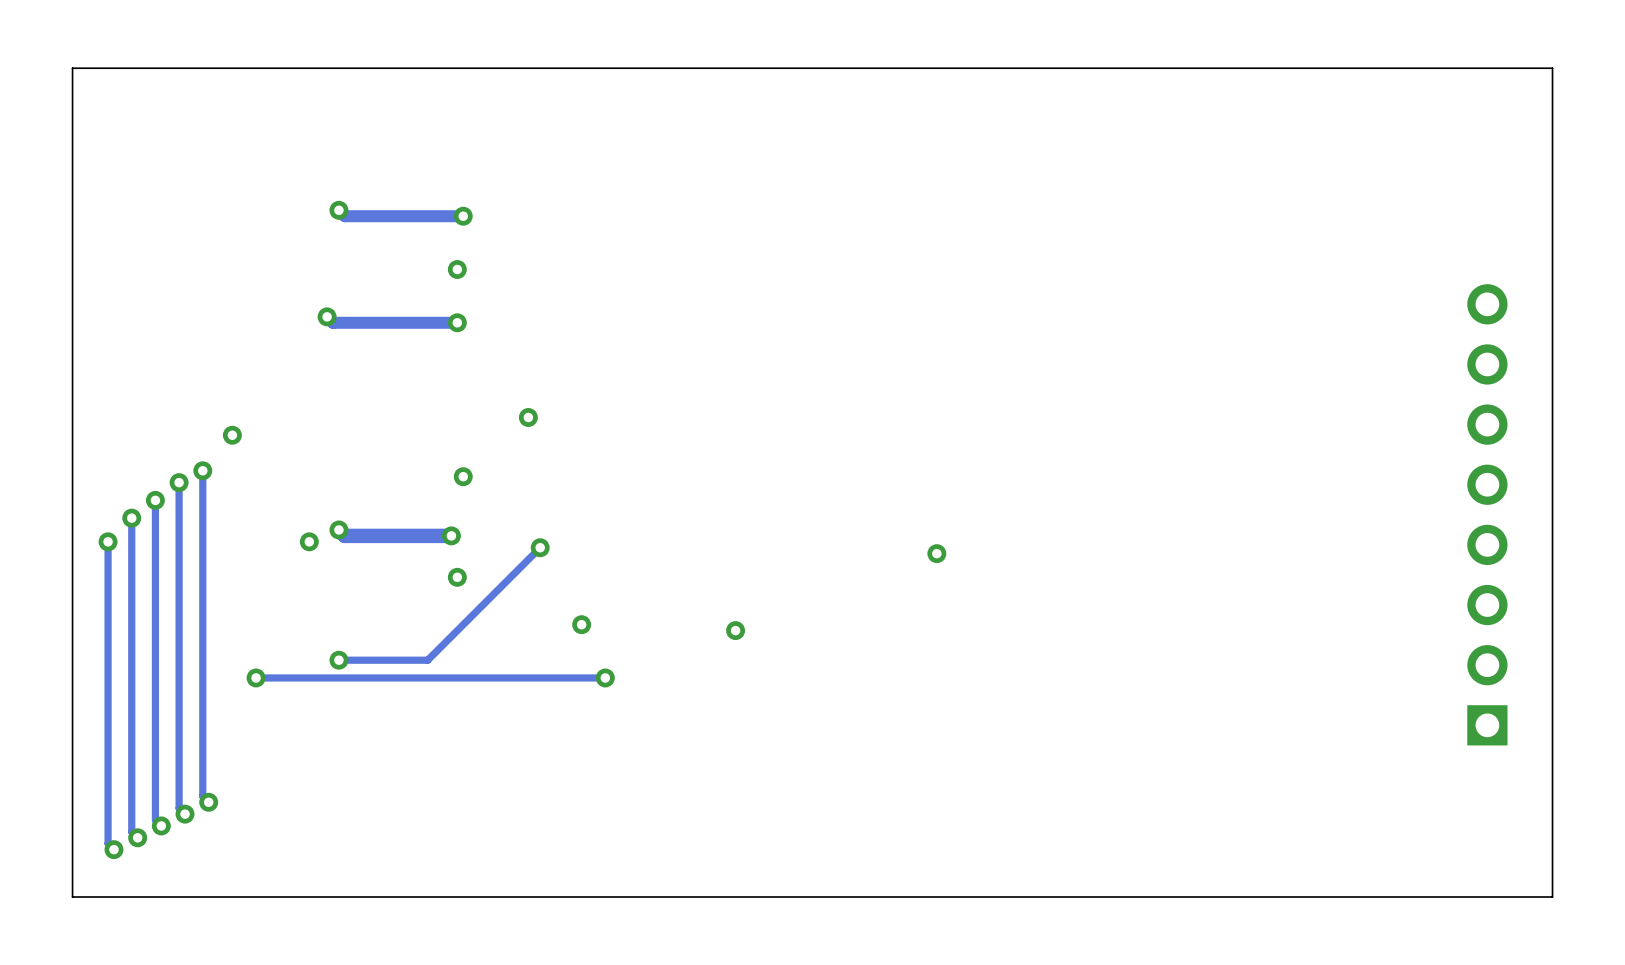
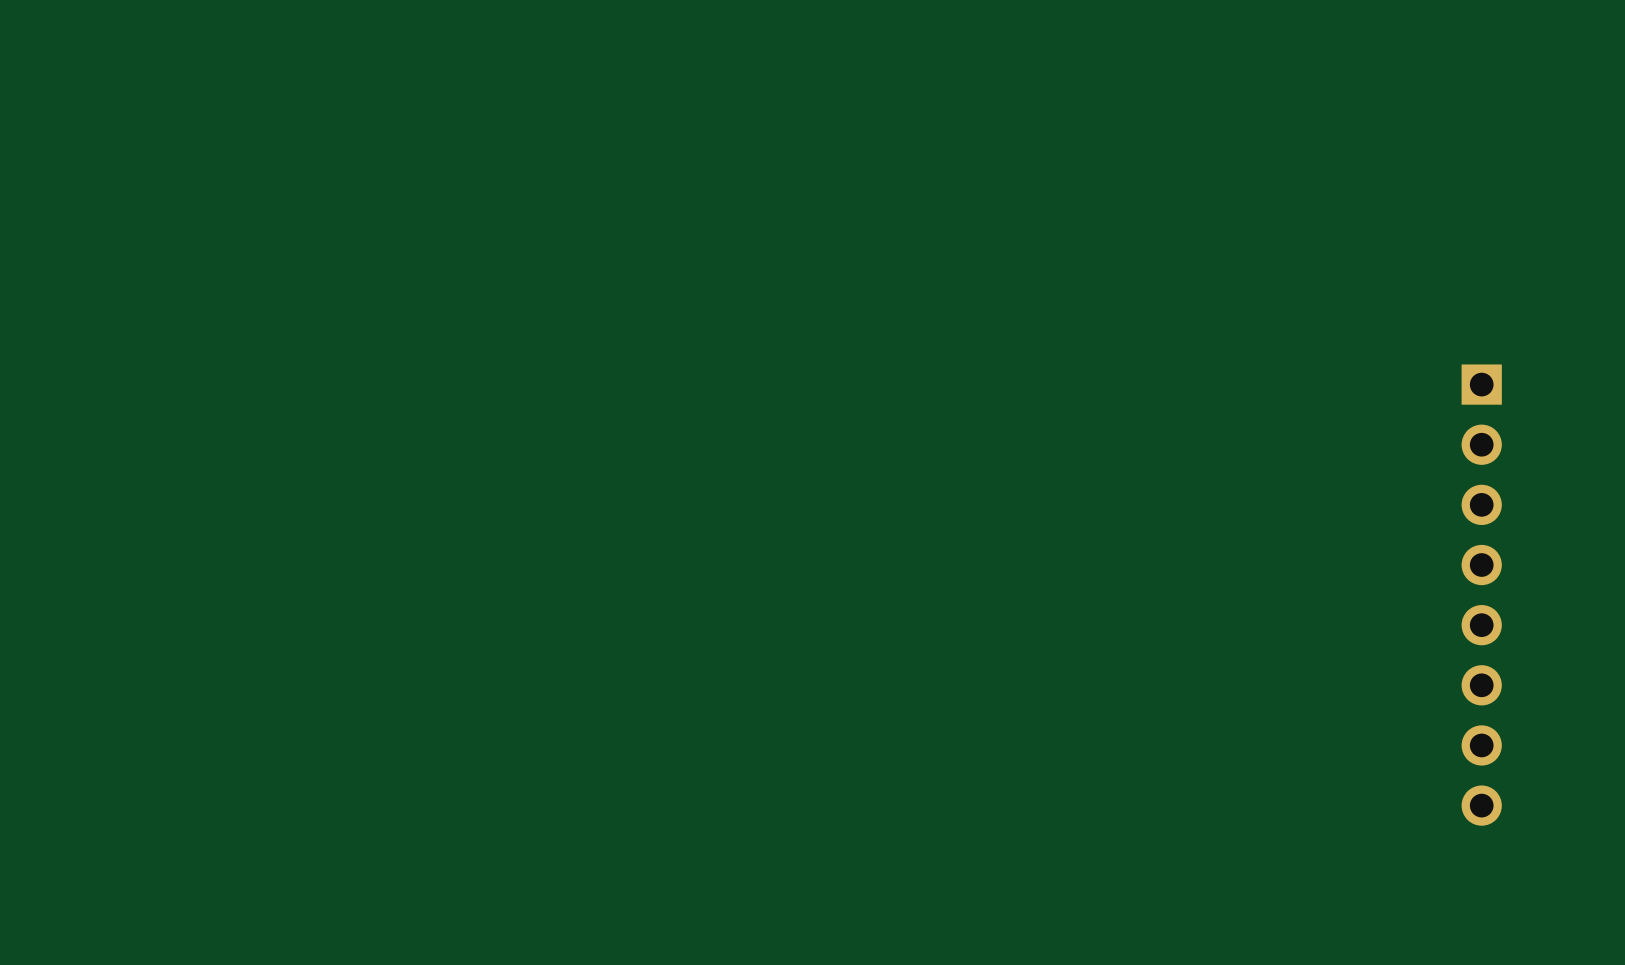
board edge: (1552, 68) (1552, 897) (72, 897) (72, 68) (1552, 68) -> none
track: (338, 210) (344, 216) (463, 216) -> none
via: (338, 210) -> none
via: (463, 216) -> none
via: (457, 269) -> none
track: (327, 316) (333, 322) (457, 322) -> none
via: (327, 316) -> none
via: (457, 322) -> none
via: (528, 417) -> none
via: (232, 435) -> none
track: (202, 470) (202, 796) (208, 802) -> none
via: (202, 470) -> none
via: (463, 476) -> none
track: (179, 482) (179, 808) (185, 814) -> none
via: (179, 482) -> none
track: (155, 500) (155, 820) (161, 825) -> none
via: (155, 500) -> none
part rotation: 0° (1487, 514) -> 180° (1481, 595)
track: (131, 518) (131, 831) (137, 837) -> none
via: (131, 518) -> none
track: (338, 529) (344, 535) (451, 535) -> none
via: (338, 529) -> none
via: (451, 535) -> none
track: (108, 541) (108, 843) (113, 849) -> none
via: (108, 541) -> none
via: (309, 541) -> none
track: (540, 547) (427, 660) (338, 660) -> none
via: (540, 547) -> none
via: (936, 553) -> none
via: (457, 577) -> none
via: (581, 624) -> none
via: (735, 630) -> none
via: (338, 660) -> none
via: (256, 677) -> none
track: (605, 677) (256, 677) -> none
via: (605, 677) -> none
via: (208, 802) -> none
via: (185, 814) -> none
via: (161, 825) -> none
via: (137, 837) -> none
via: (113, 849) -> none

